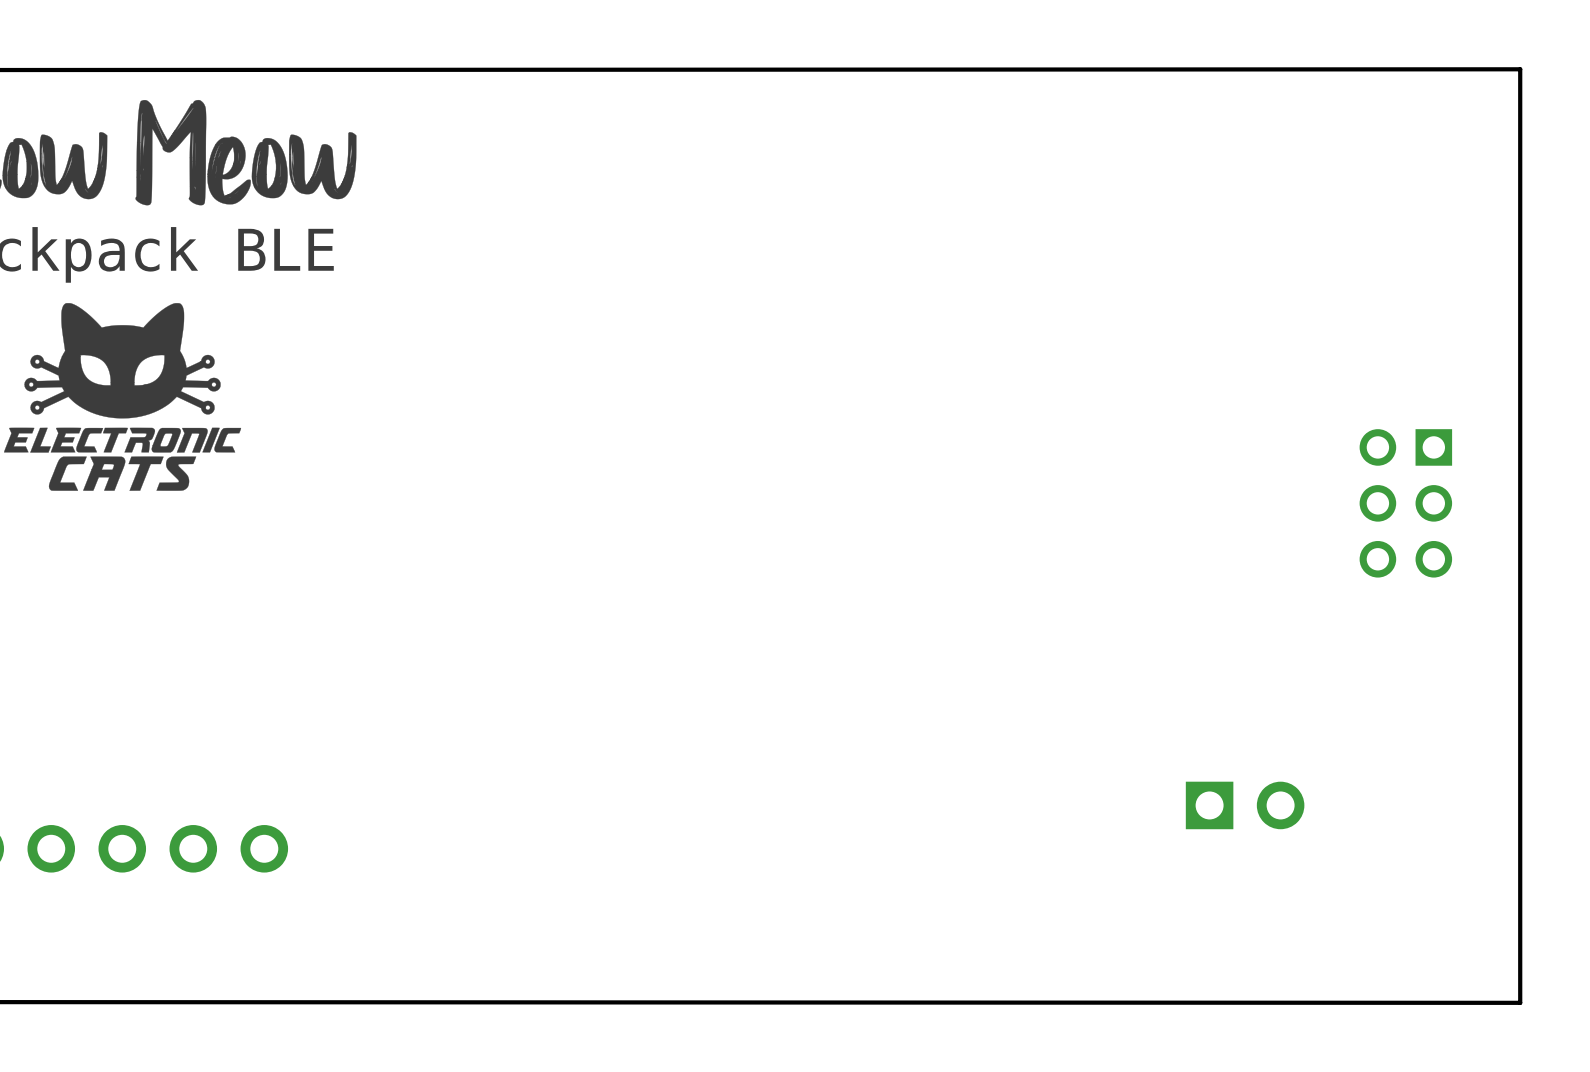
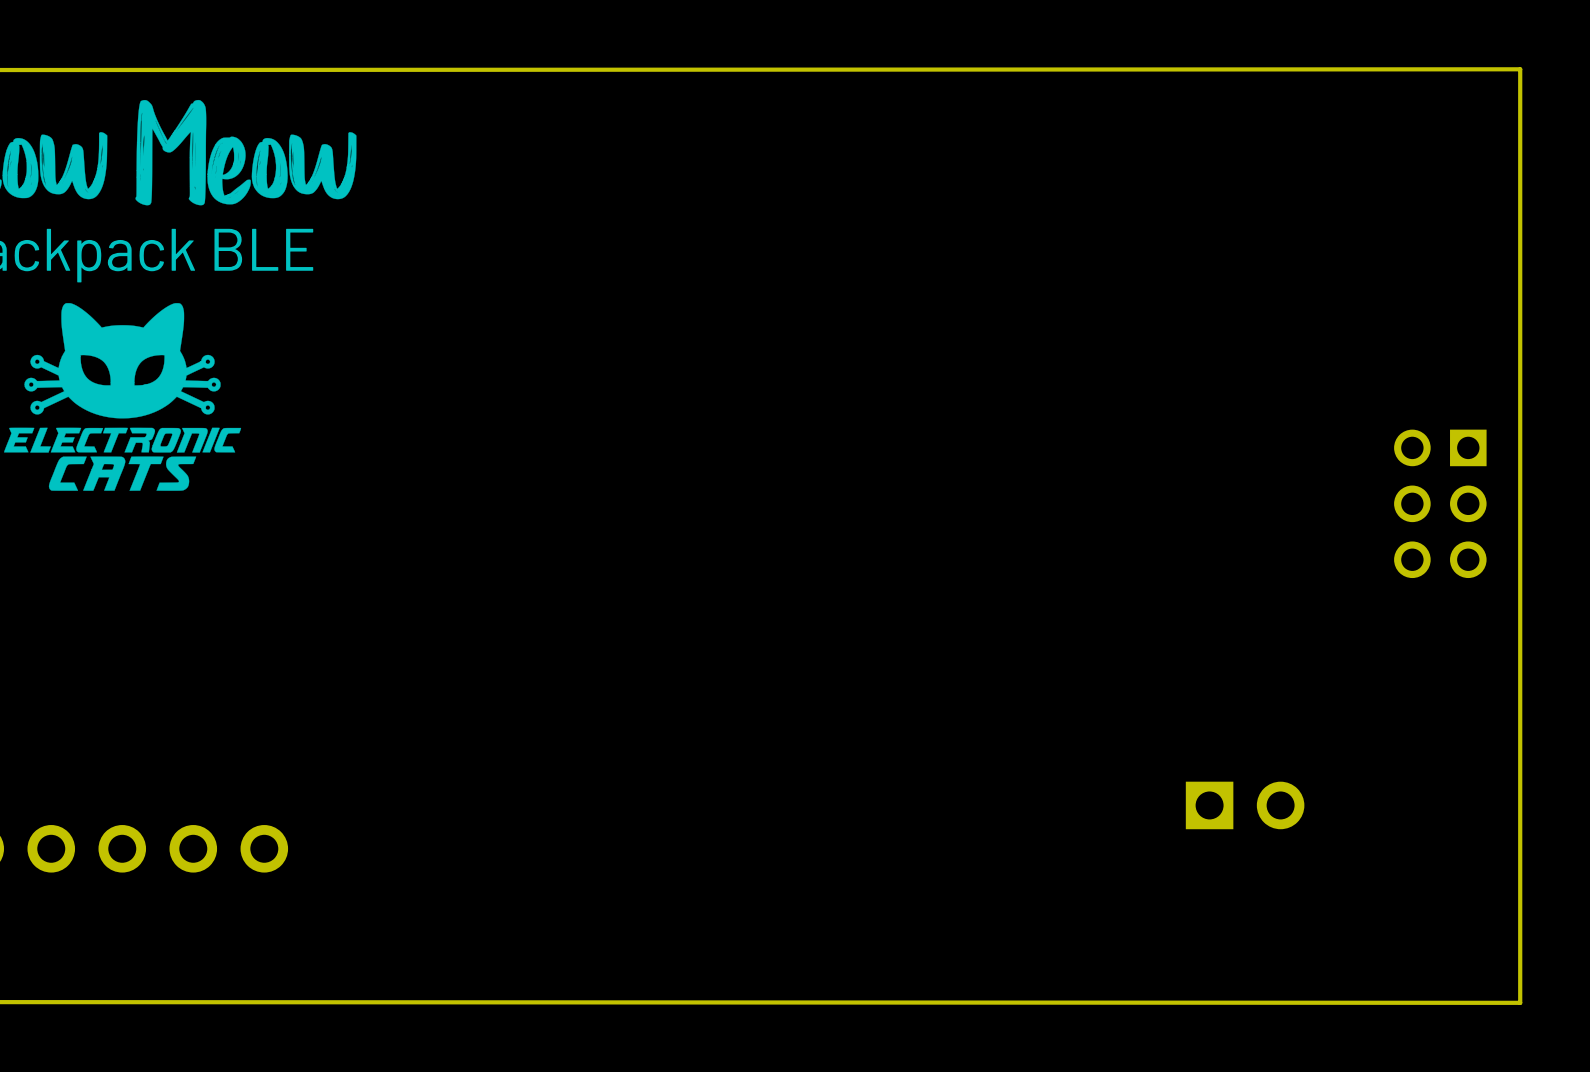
part position: (1405, 503) -> (1440, 503)

